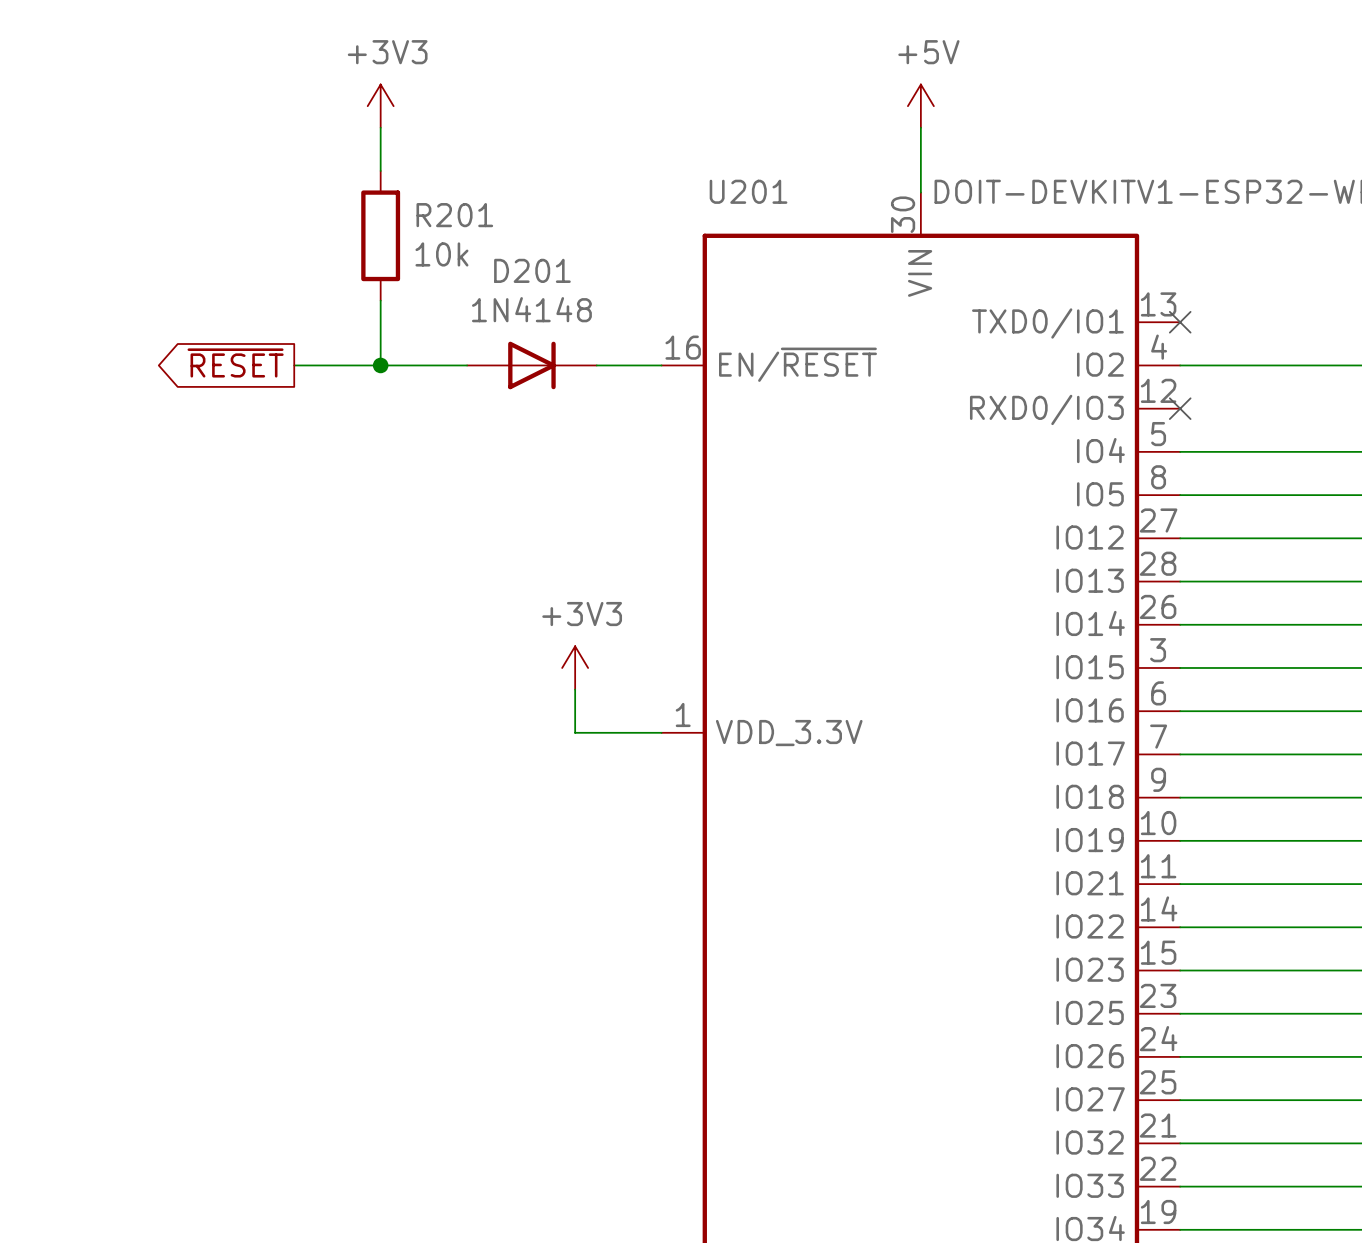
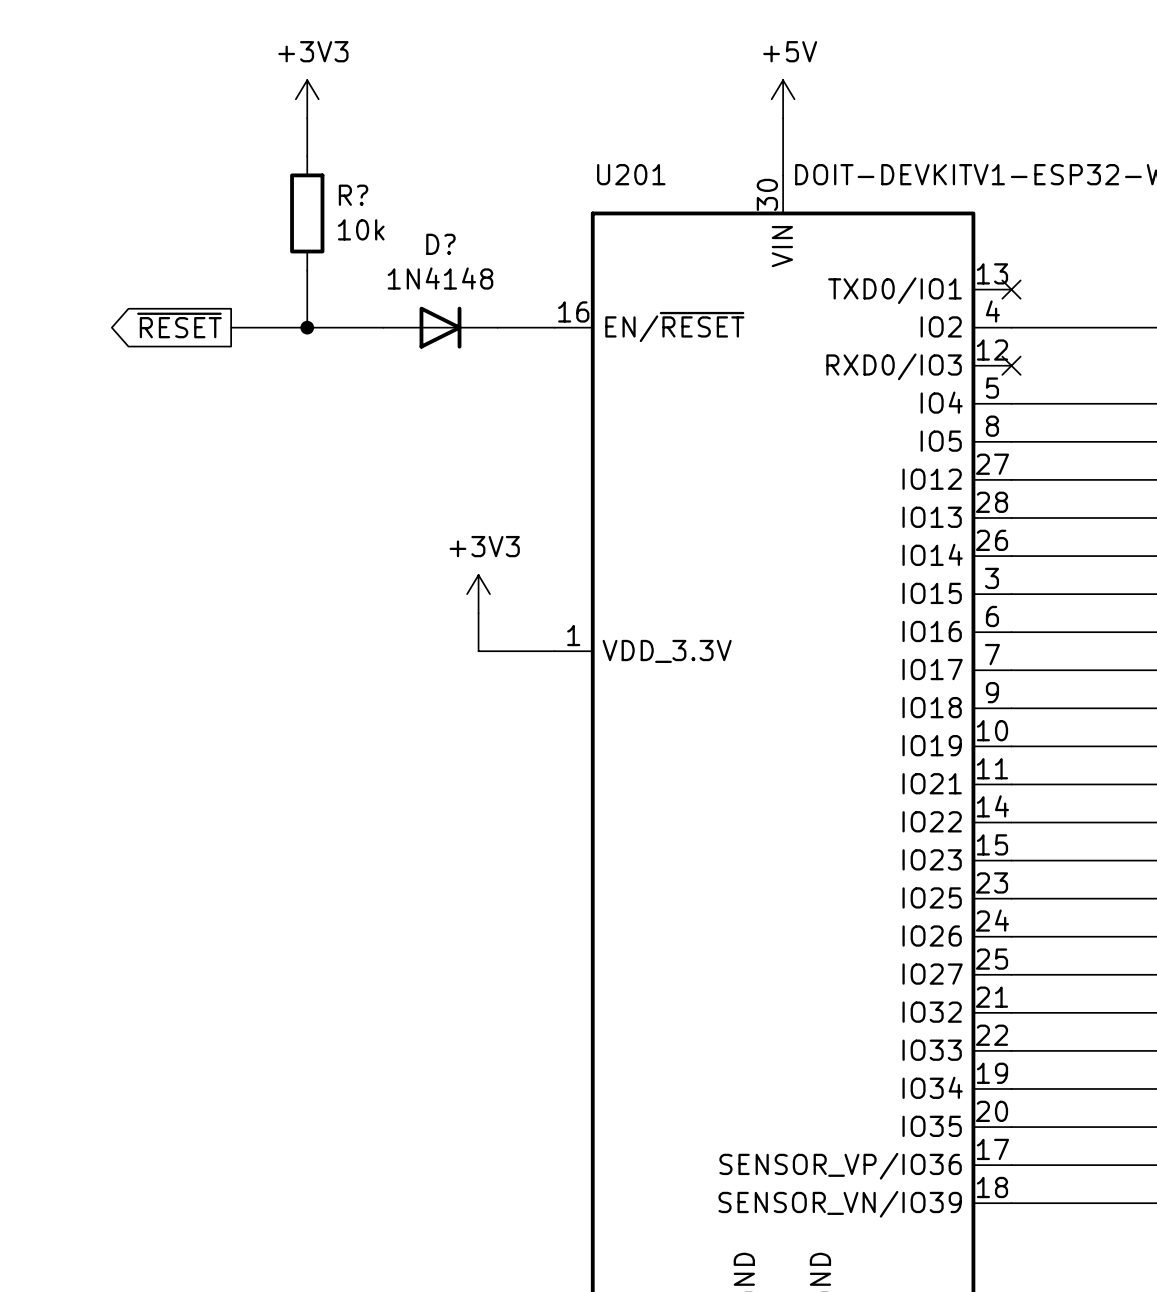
R201 name: R201 (454, 215) -> R? (353, 195)
D201 name: D201 (532, 270) -> D? (440, 244)

